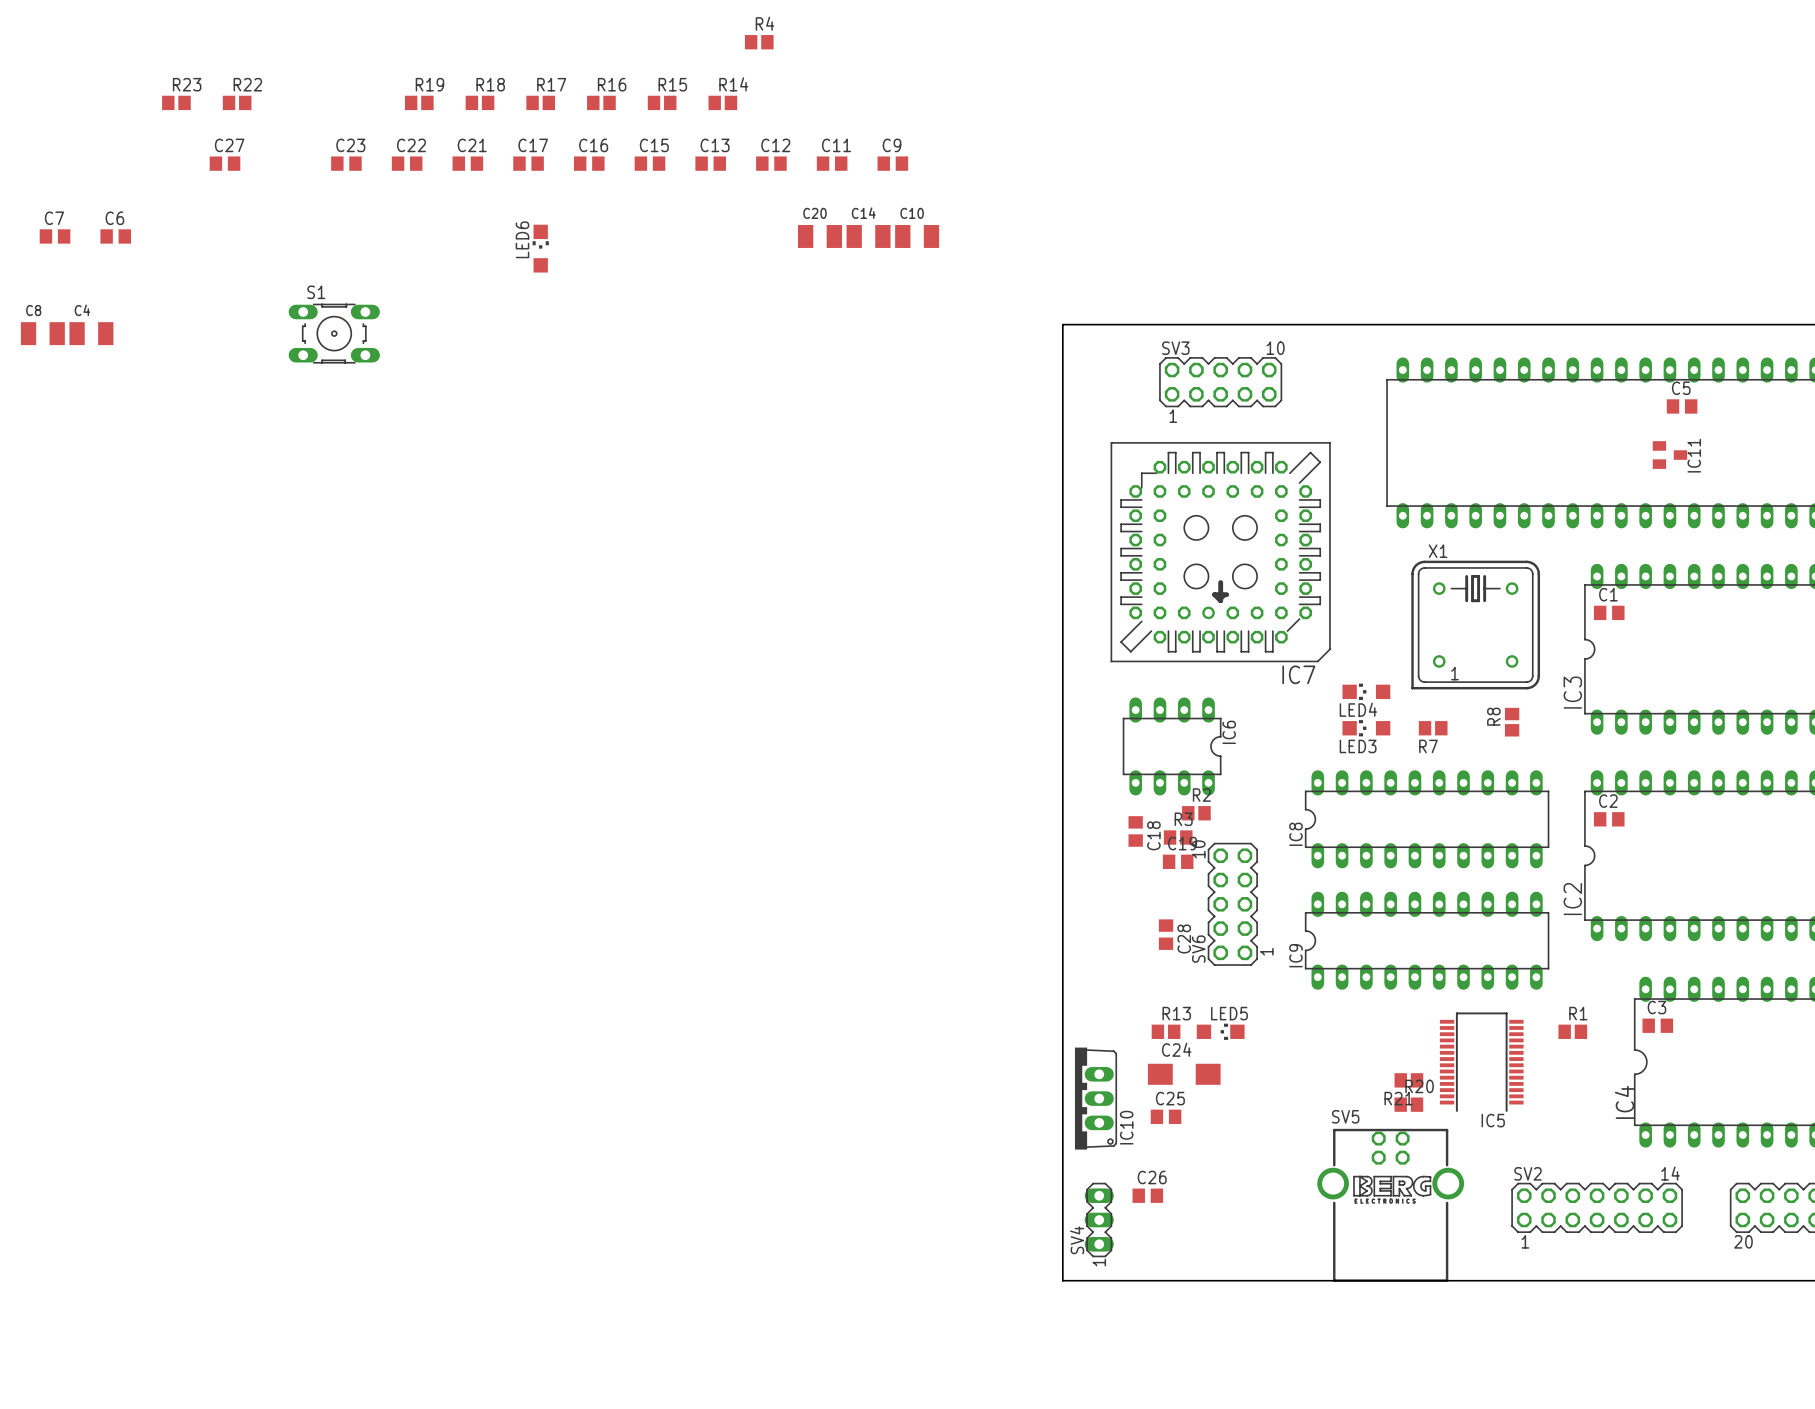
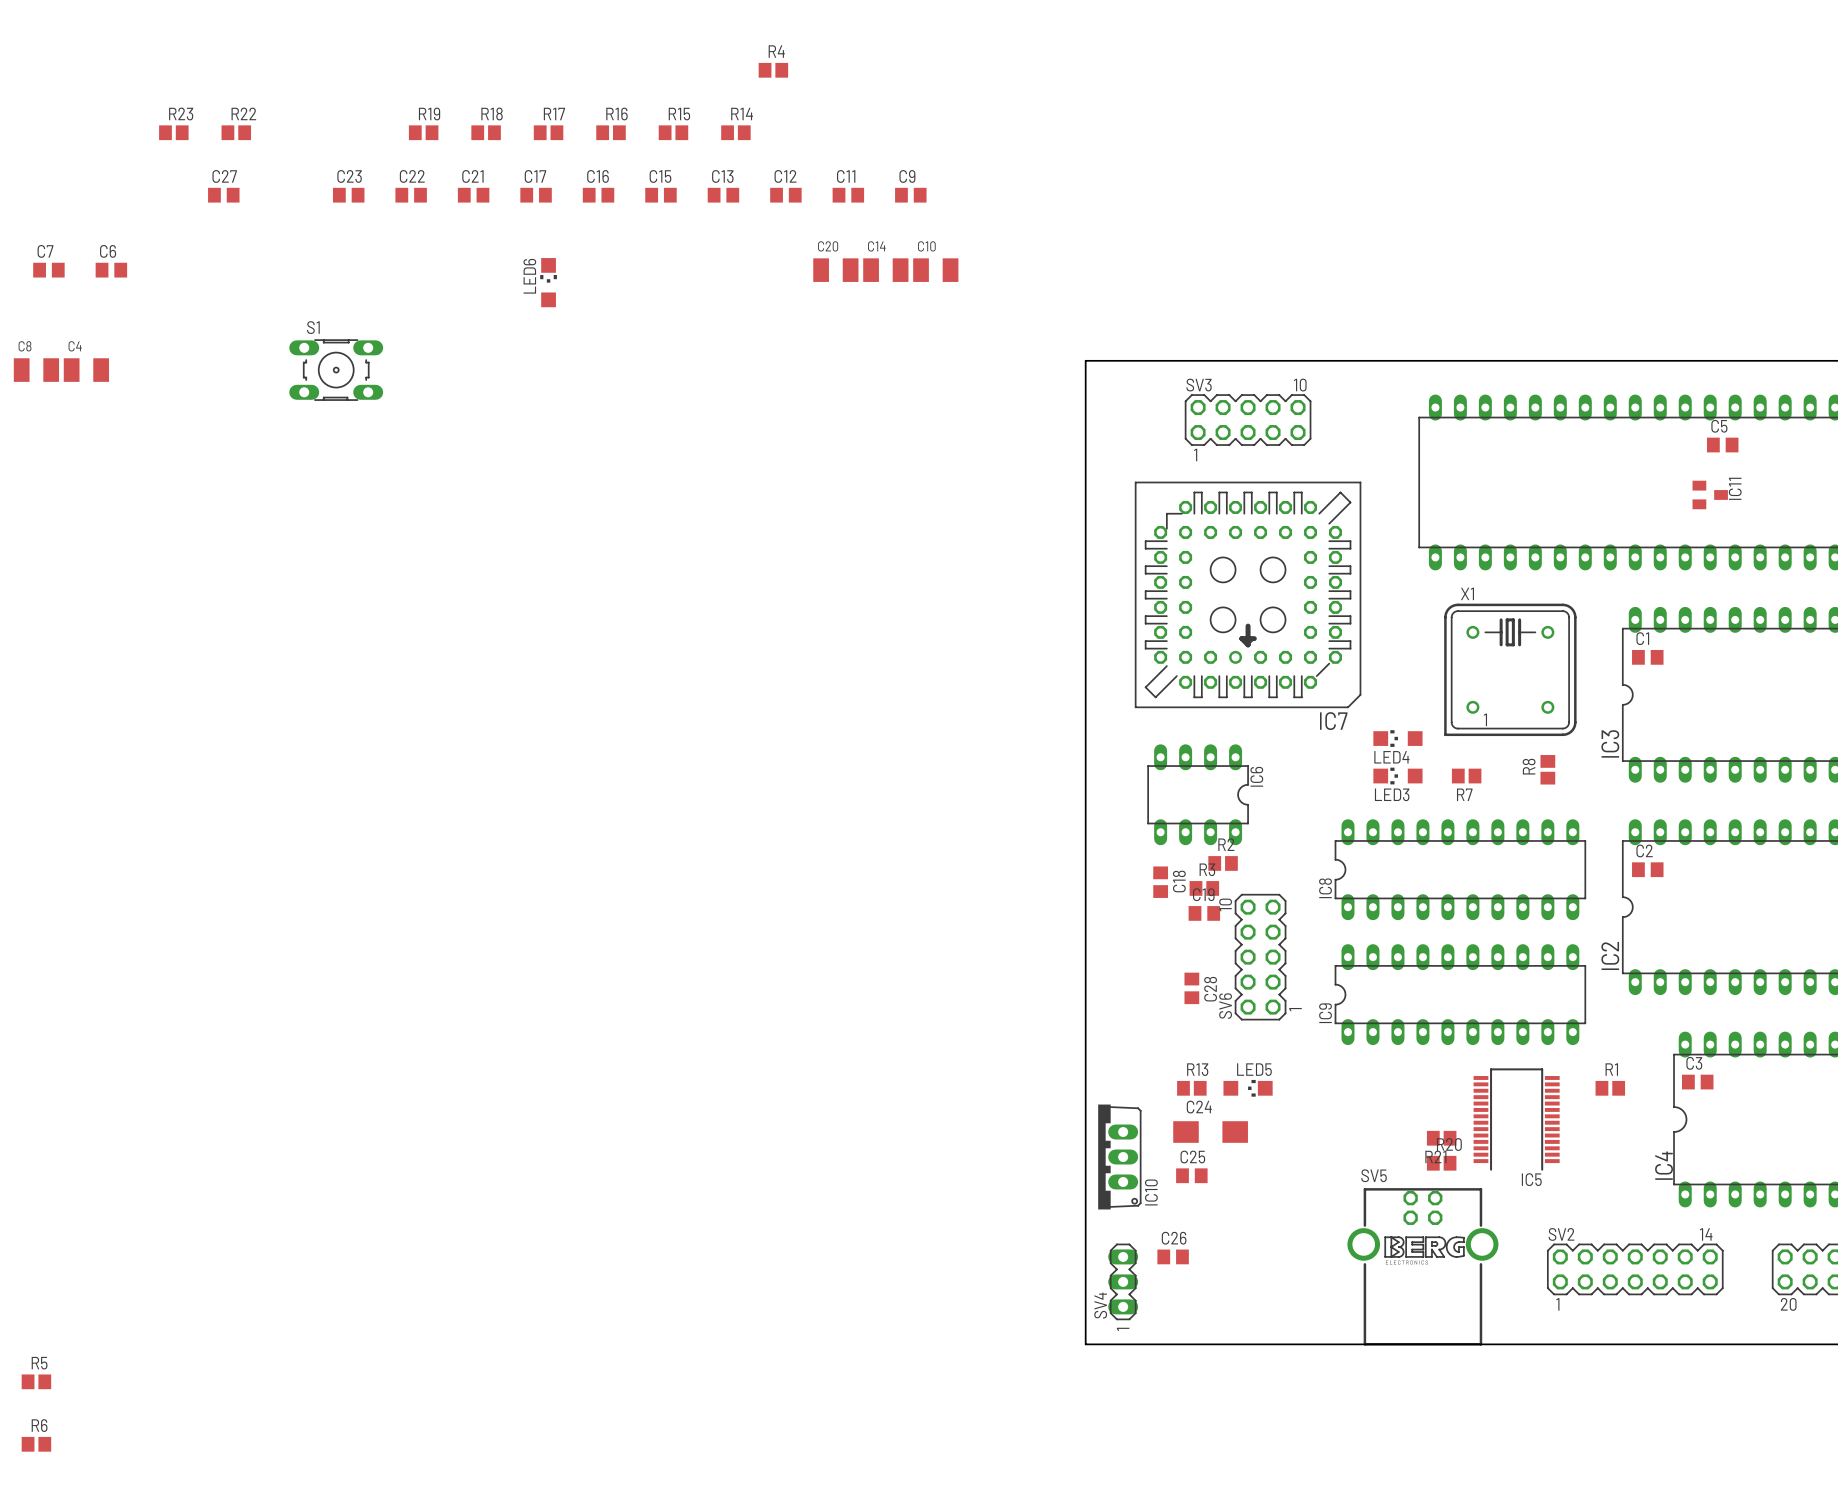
R5: none -> (36, 1381)
R6: none -> (36, 1444)

